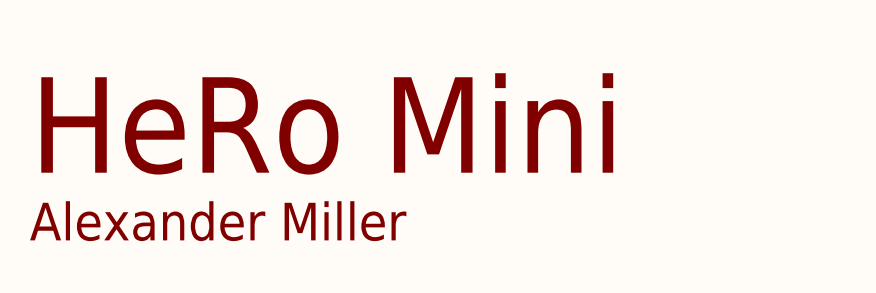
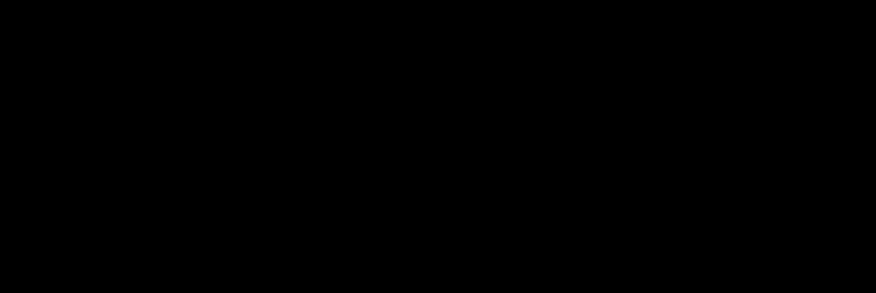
text: HeRo Mini (327, 123) -> none
text: Alexander Miller (218, 221) -> none

